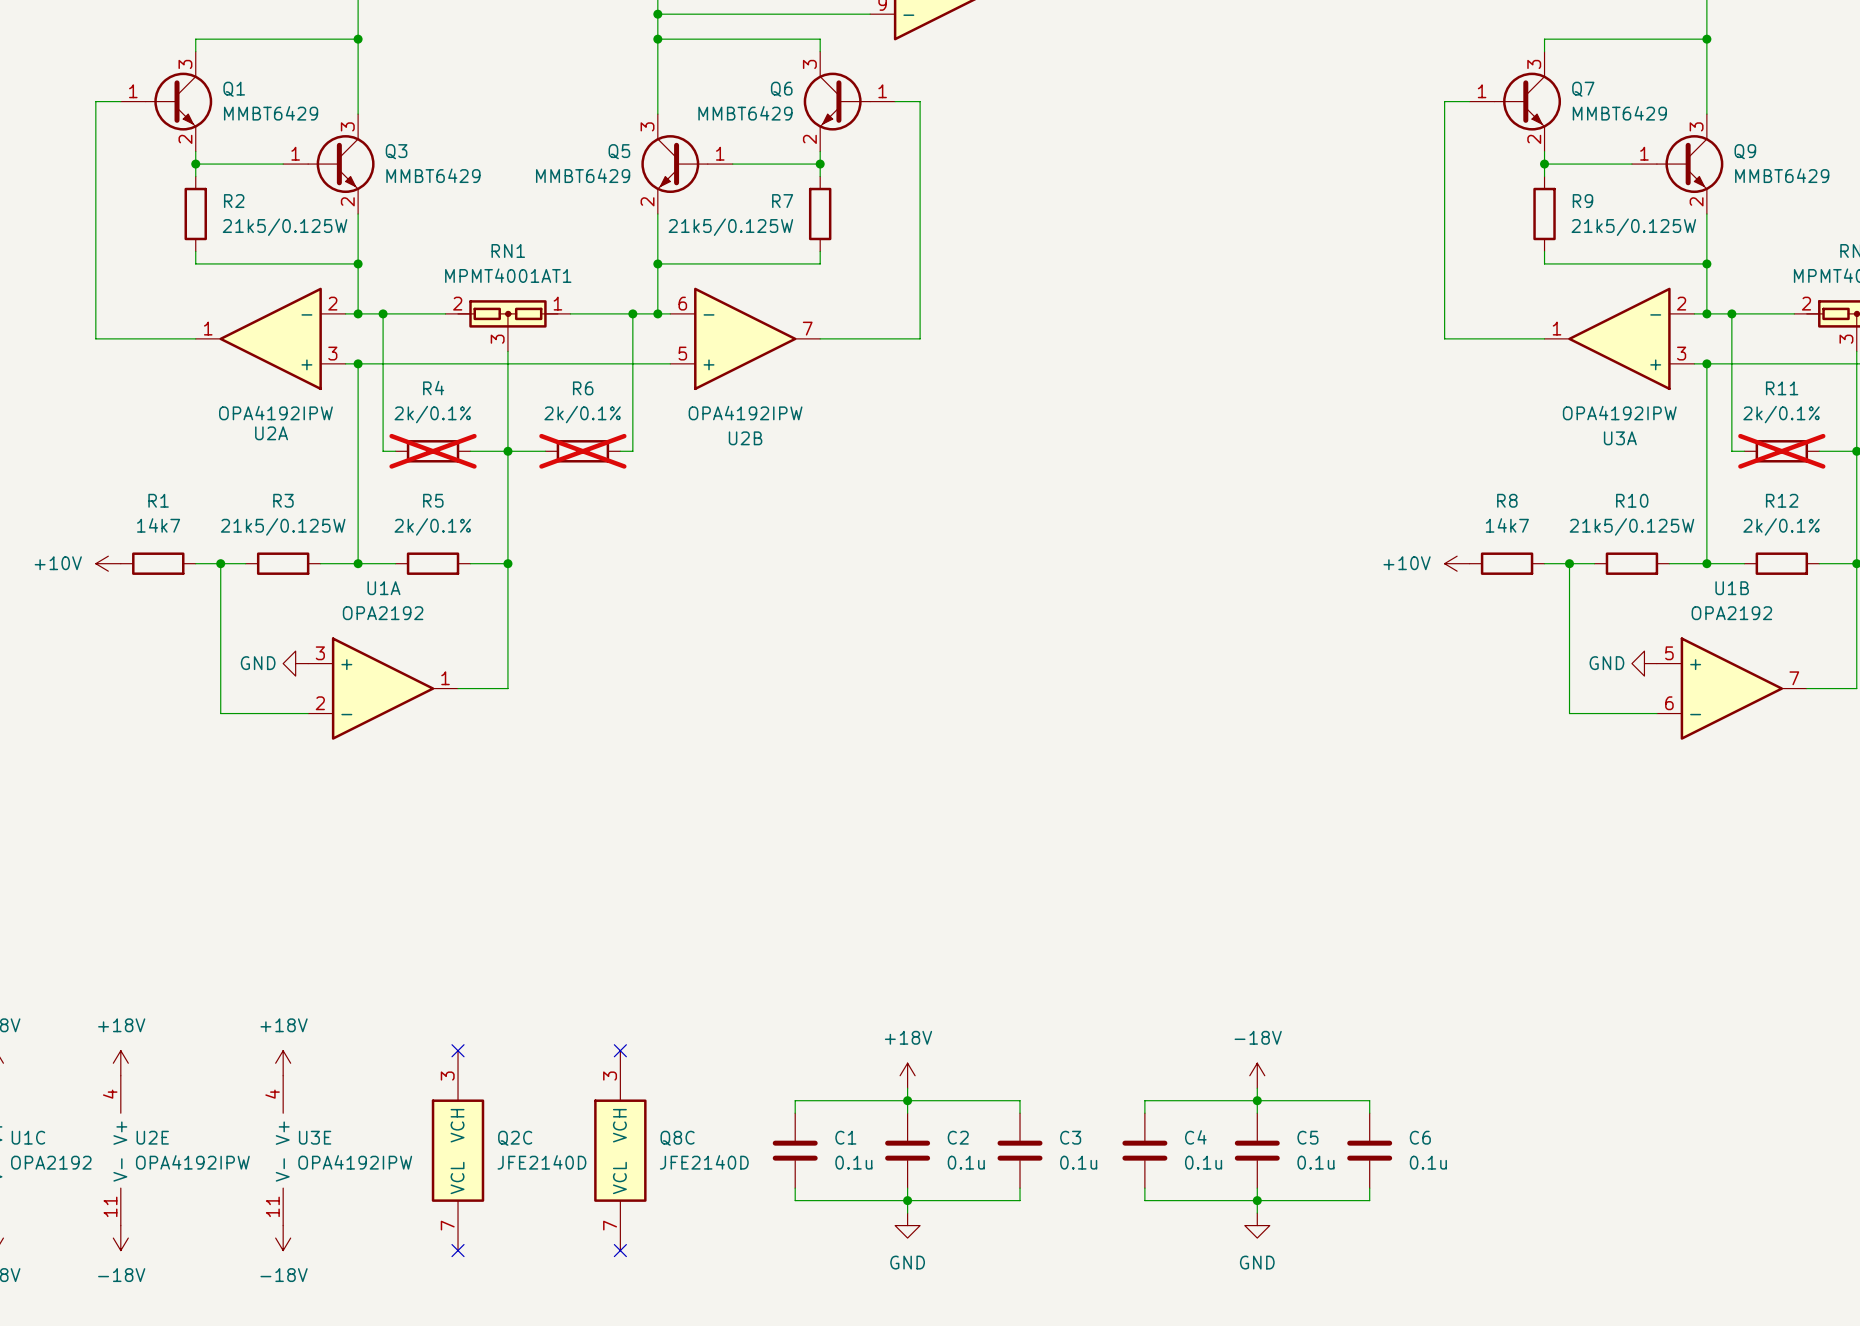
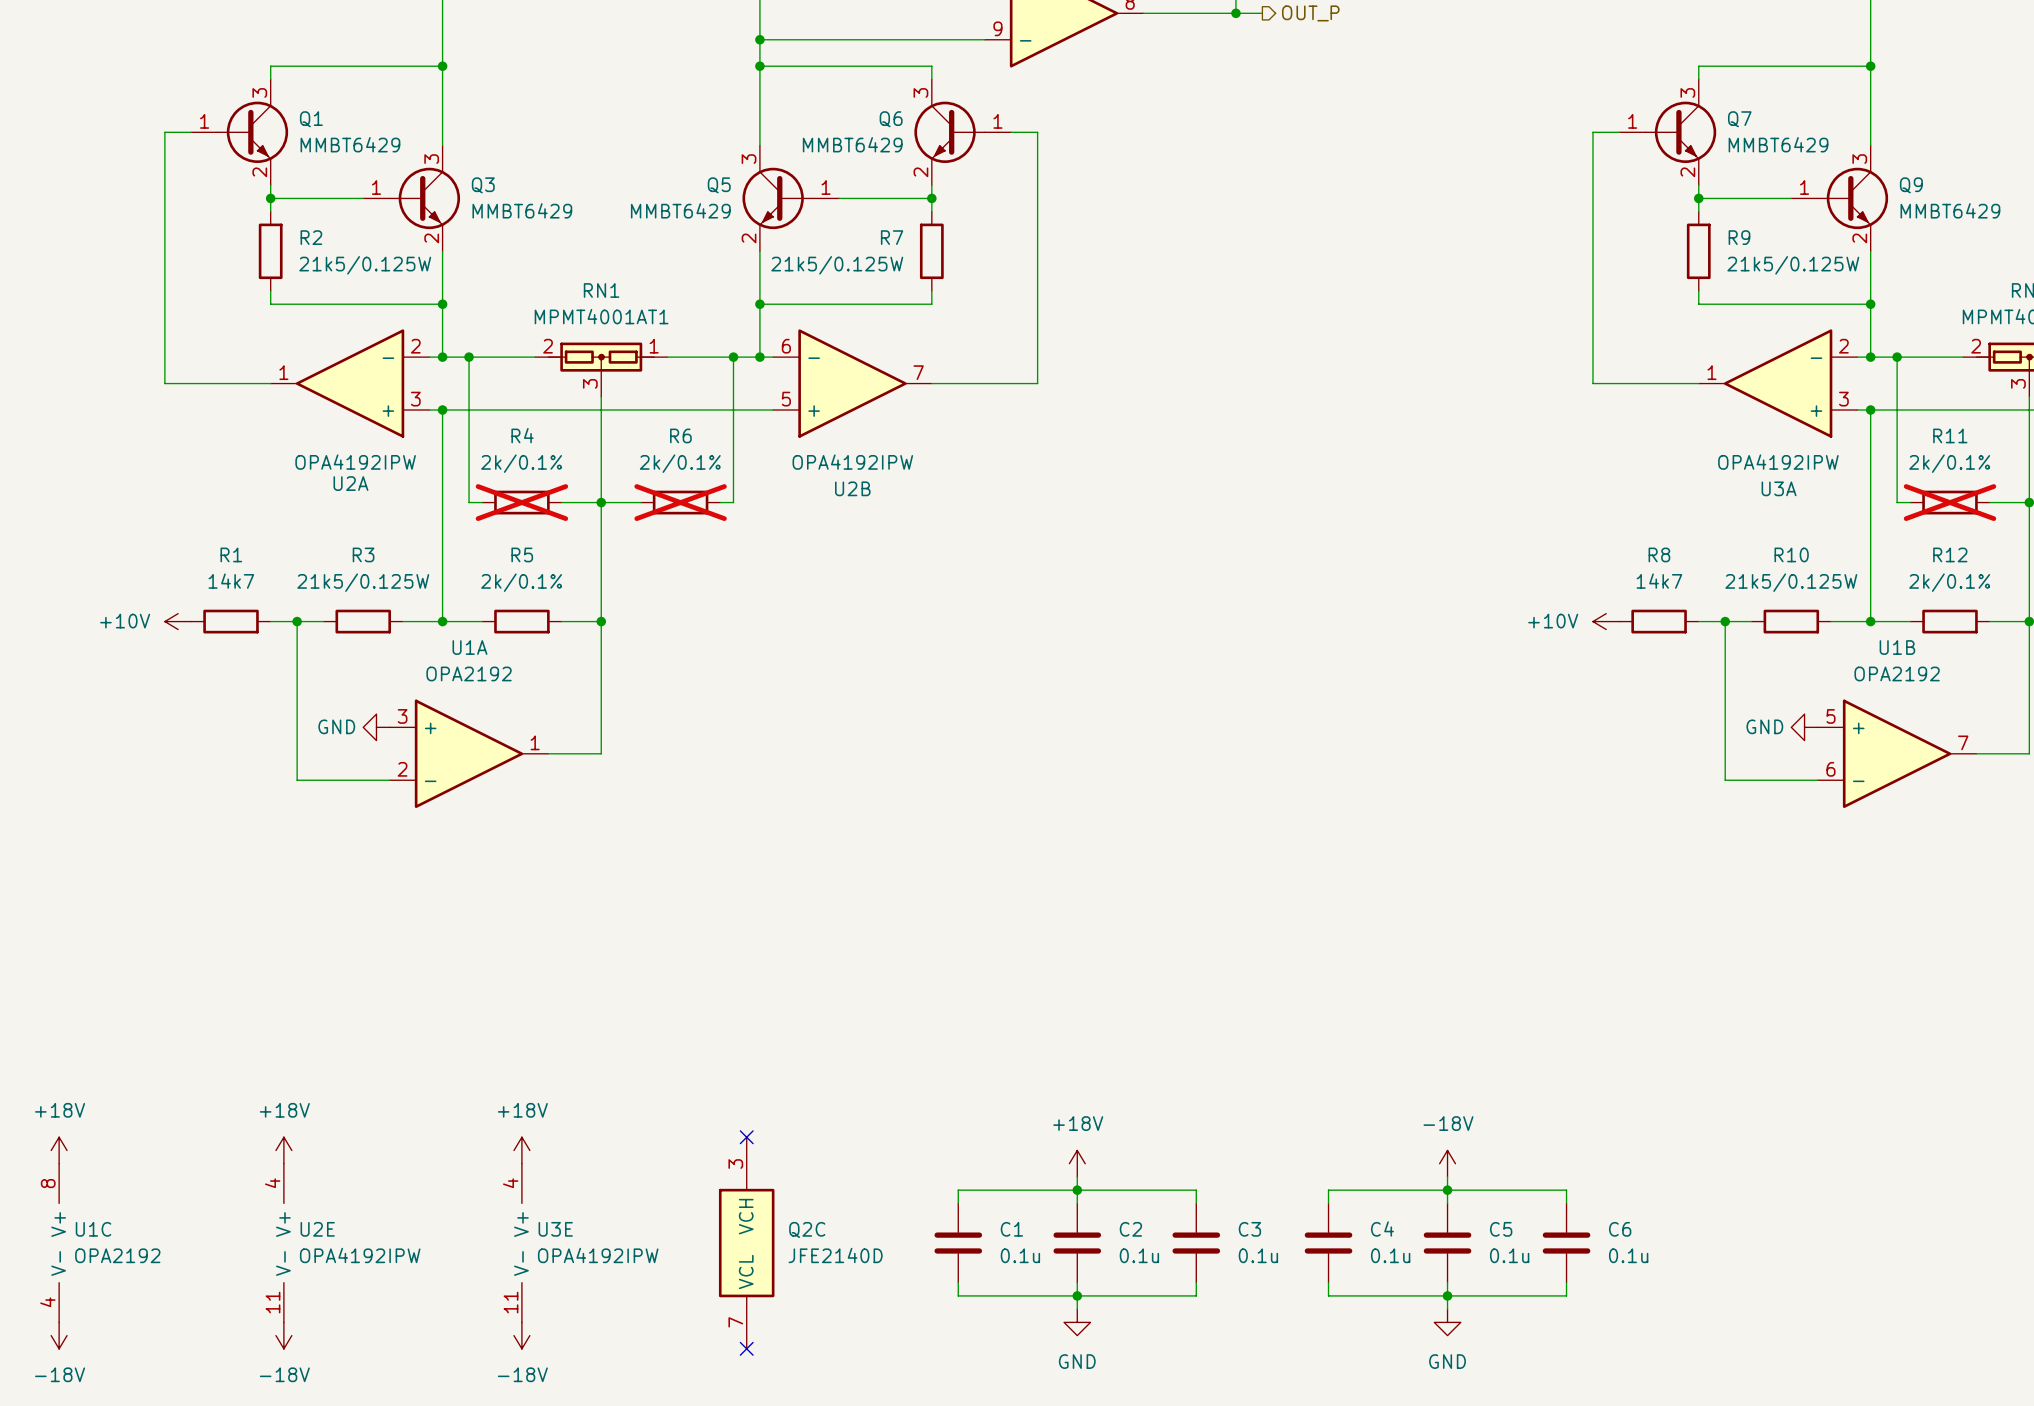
no-connect mark: (458, 1050) -> none
no-connect mark position: (620, 1050) -> (746, 1137)
power symbol: +18V (120, 1063) -> none
power symbol: none -> +18V (283, 1150)
power symbol: +18V (283, 1063) -> none
power symbol: none -> +18V (521, 1150)
power symbol position: +18V (907, 1075) -> +18V (1077, 1163)
power symbol position: -18V (1257, 1075) -> -18V (1447, 1163)
wire: (907, 1088) (907, 1113) -> (1077, 1176) (1077, 1203)
wire: (1257, 1088) (1257, 1113) -> (1447, 1176) (1447, 1203)
wire: (845, 1100) (795, 1100) (795, 1113) -> (958, 1190) (958, 1203)
junction position: (907, 1100) -> (1077, 1190)
wire: (1020, 1100) (1020, 1113) -> (1143, 1190) (1196, 1190) (1196, 1203)
wire: (1194, 1100) (1144, 1100) (1144, 1113) -> (1328, 1190) (1328, 1203)
junction position: (1257, 1100) -> (1447, 1190)
wire: (1369, 1100) (1369, 1113) -> (1513, 1190) (1566, 1190) (1566, 1203)
U2E position: (120, 1150) -> (283, 1243)
U3E position: (283, 1150) -> (521, 1243)
Q2C position: (458, 1150) -> (746, 1243)
Q8C: JFE2140D (620, 1150) -> none
C1 position: (795, 1150) -> (958, 1243)
C2 position: (907, 1150) -> (1077, 1243)
C3 position: (1020, 1150) -> (1196, 1243)
C4 position: (1144, 1150) -> (1328, 1243)
C5 position: (1257, 1150) -> (1447, 1243)
C6 position: (1369, 1150) -> (1566, 1243)
wire: (795, 1188) (795, 1200) (845, 1200) -> (958, 1282) (958, 1295)
wire: (907, 1188) (907, 1213) -> (1077, 1282) (1077, 1309)
wire: (1020, 1188) (1020, 1200) -> (1196, 1282) (1196, 1295) (1143, 1295)
wire: (1144, 1188) (1144, 1200) (1194, 1200) -> (1328, 1282) (1328, 1295)
wire: (1257, 1188) (1257, 1213) -> (1447, 1282) (1447, 1309)
wire: (1369, 1188) (1369, 1200) -> (1566, 1282) (1566, 1295) (1513, 1295)
junction position: (907, 1200) -> (1077, 1295)
junction position: (1257, 1200) -> (1447, 1295)
power symbol position: GND (907, 1225) -> GND (1077, 1322)
power symbol position: GND (1257, 1225) -> GND (1447, 1322)
power symbol: -18V (120, 1238) -> none
power symbol: none -> -18V (283, 1335)
power symbol: -18V (283, 1238) -> none
power symbol: none -> -18V (521, 1335)
no-connect mark: (458, 1250) -> none
no-connect mark position: (620, 1250) -> (746, 1348)

